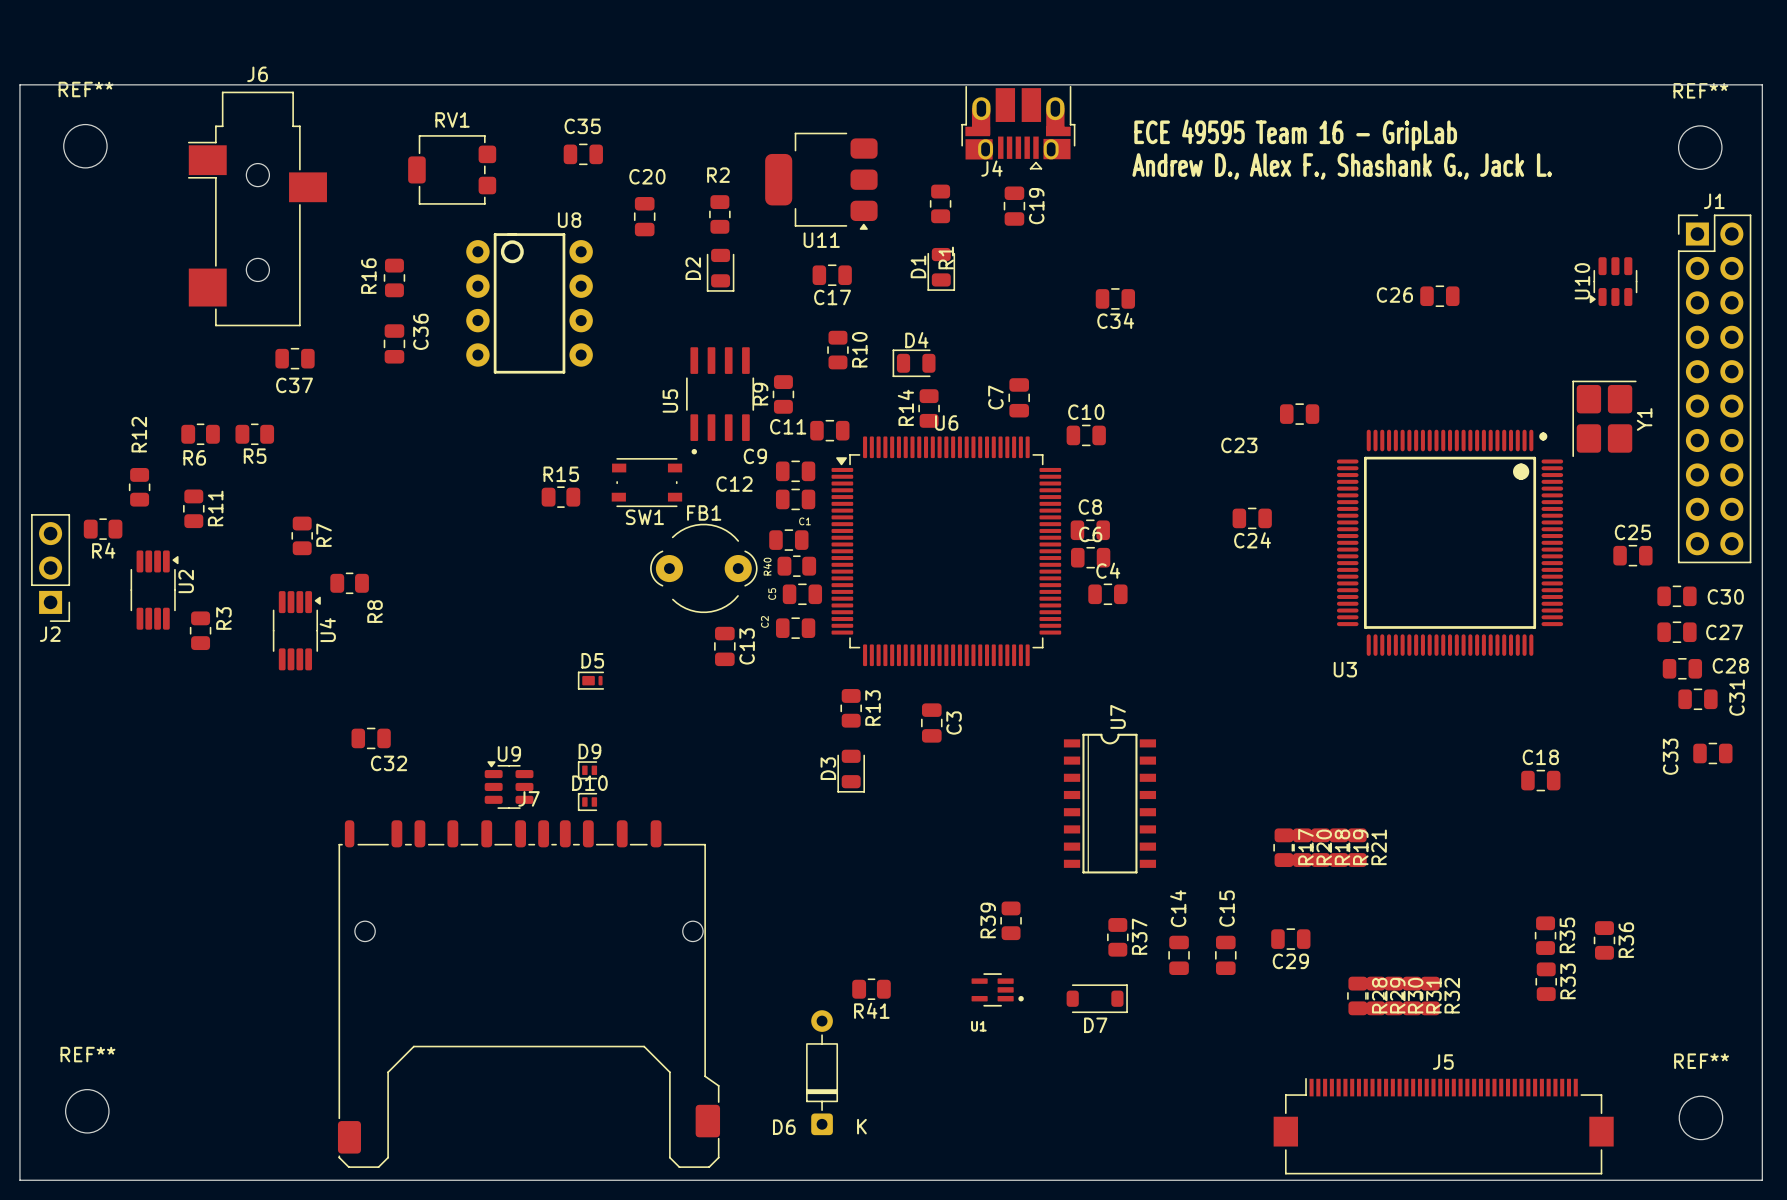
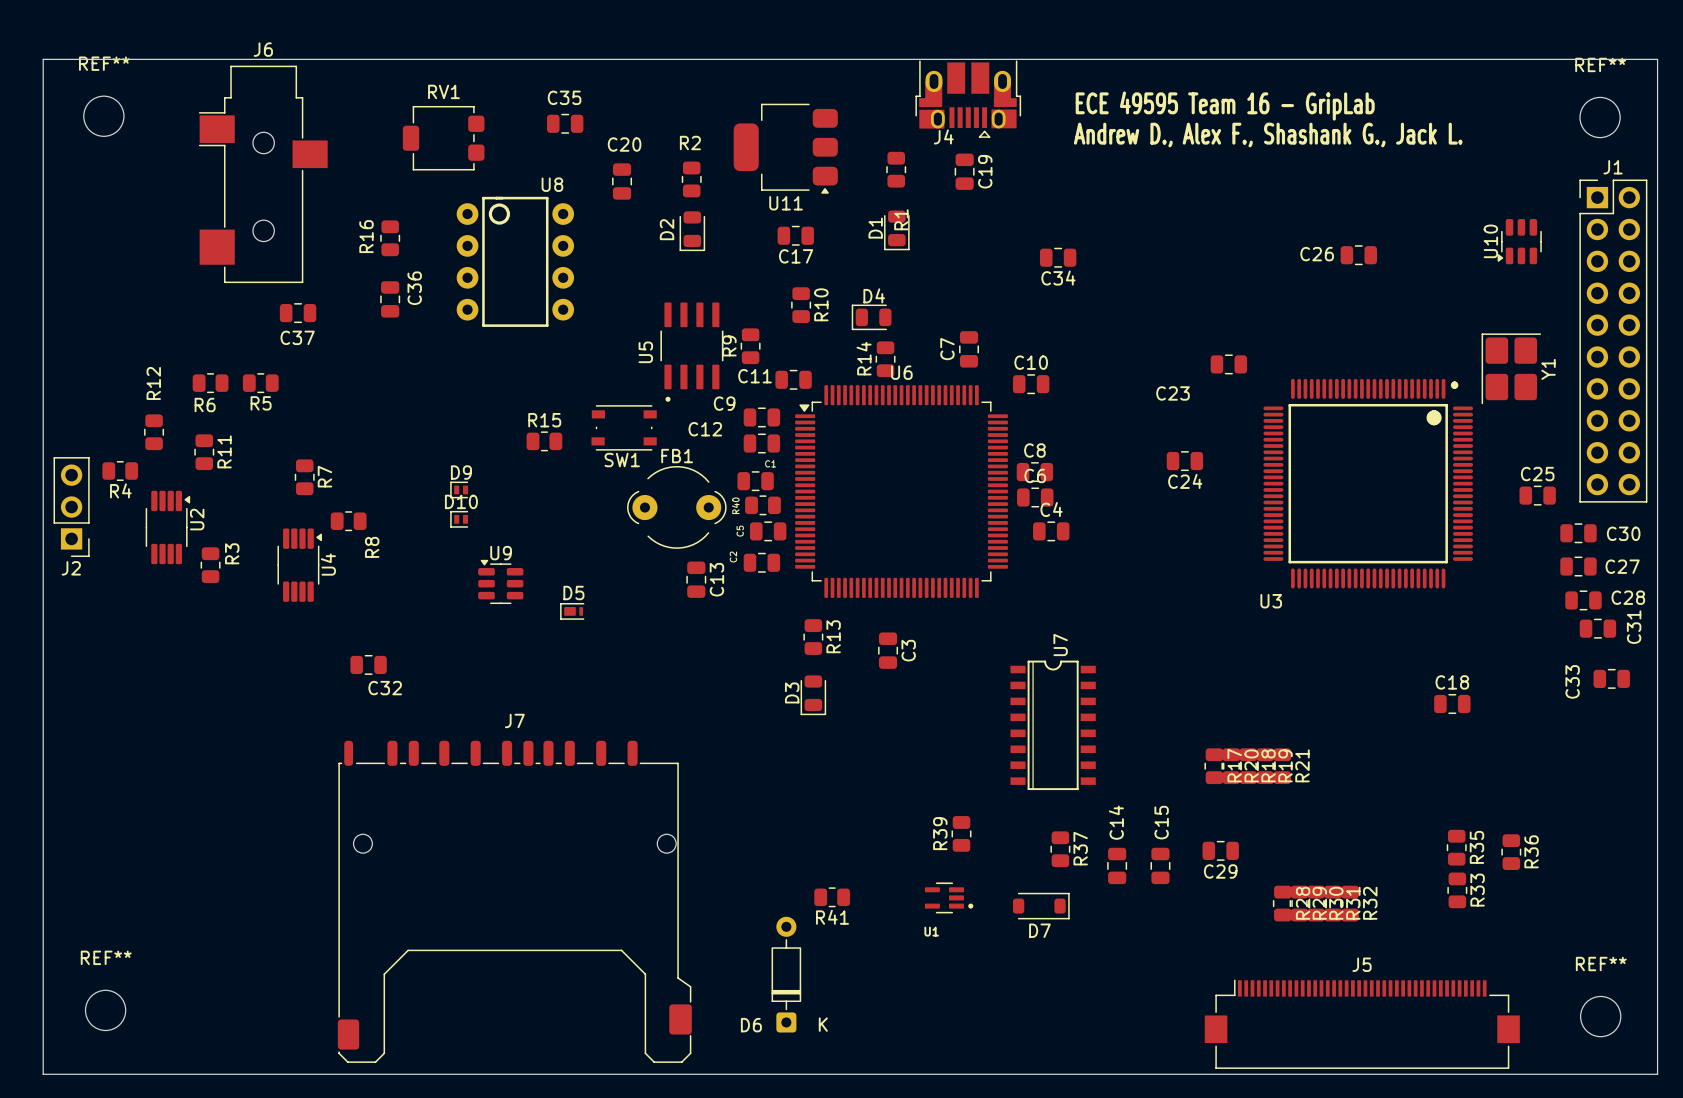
D9 position: (587, 770) -> (459, 489)
U9 position: (509, 785) -> (500, 581)
D10 position: (587, 801) -> (459, 519)

